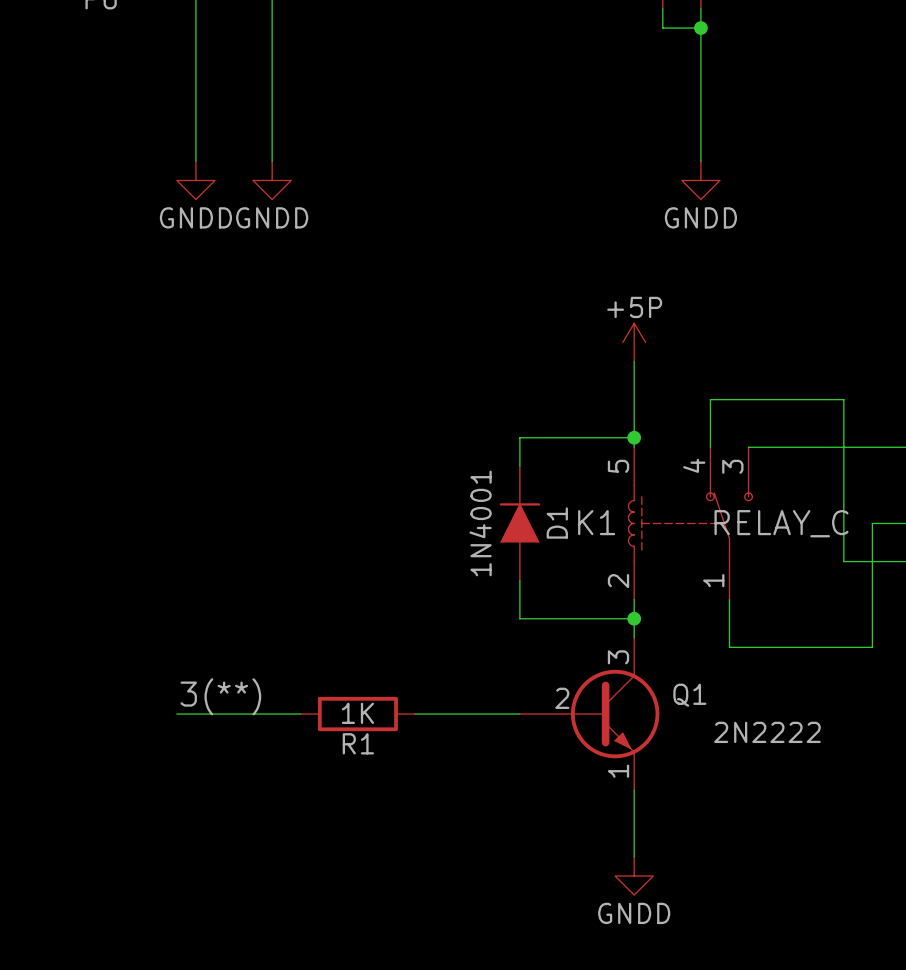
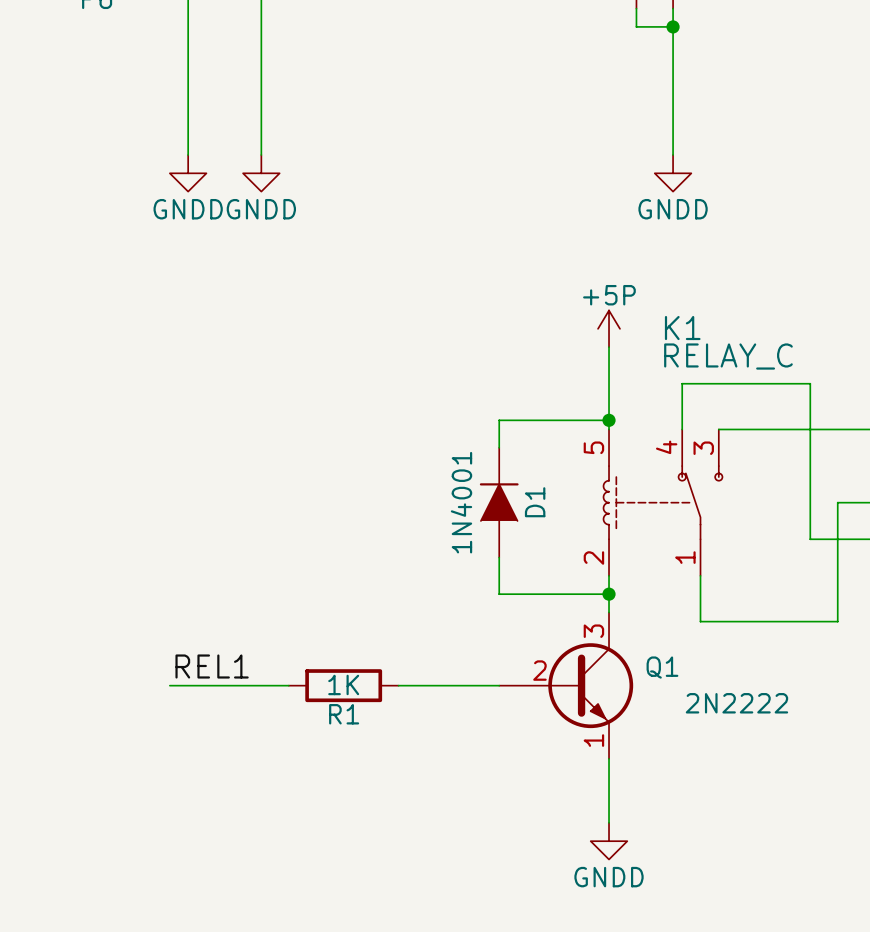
K1 name position: K1 (596, 522) -> K1 (682, 328)
K1 value position: RELAY_C (781, 523) -> RELAY_C (728, 356)
label: 3(**) (220, 696) -> REL1 (212, 666)

